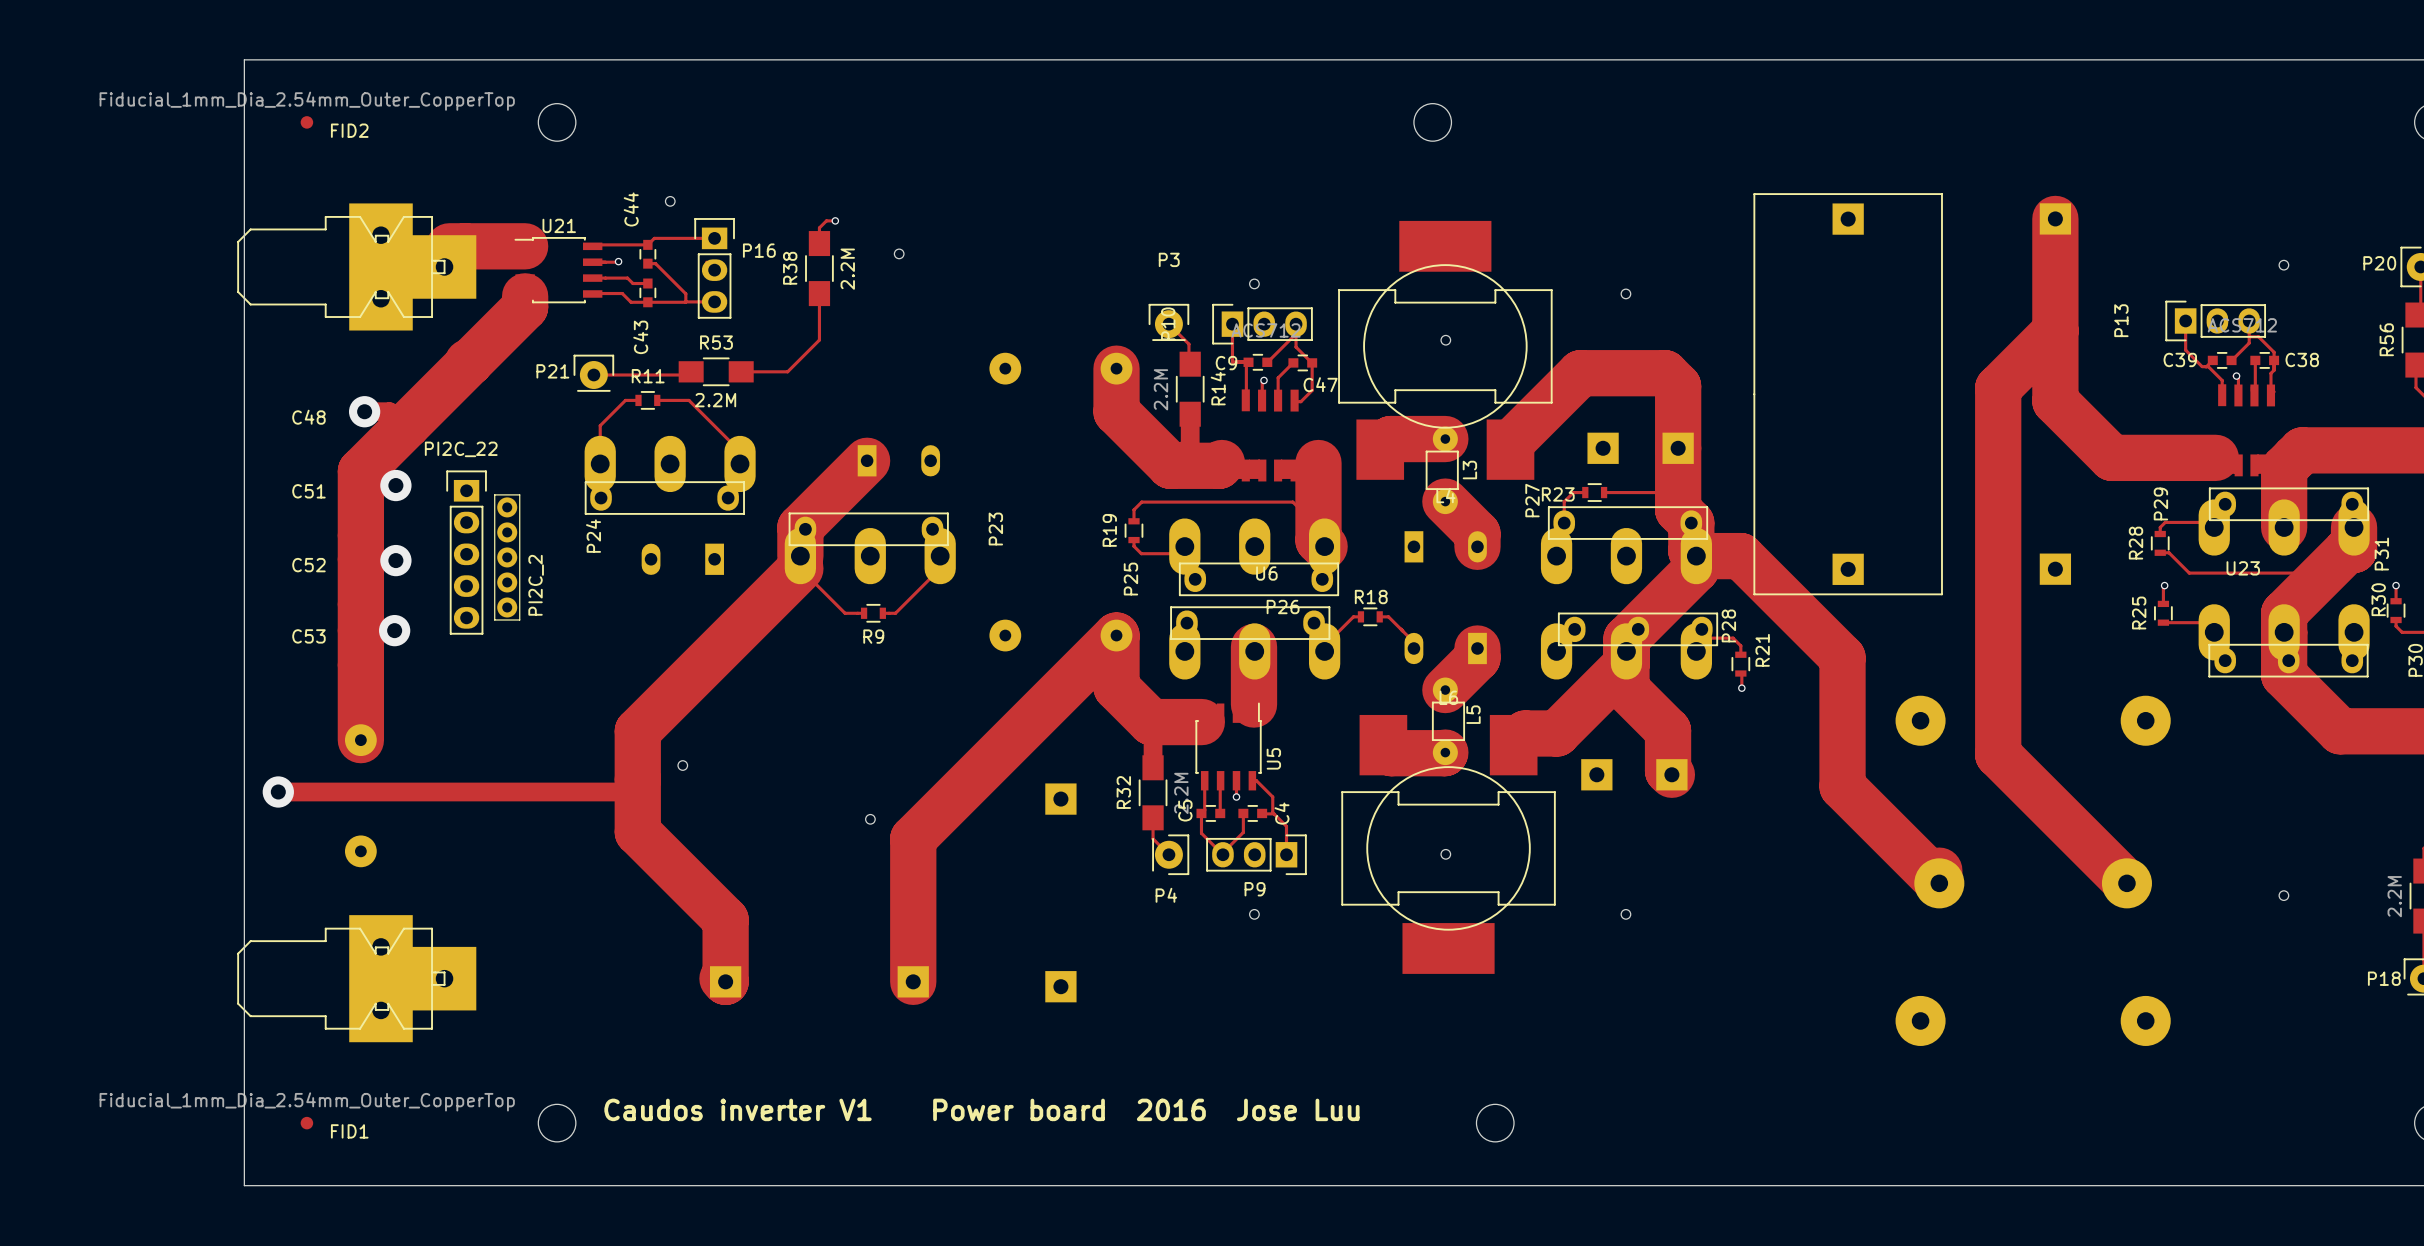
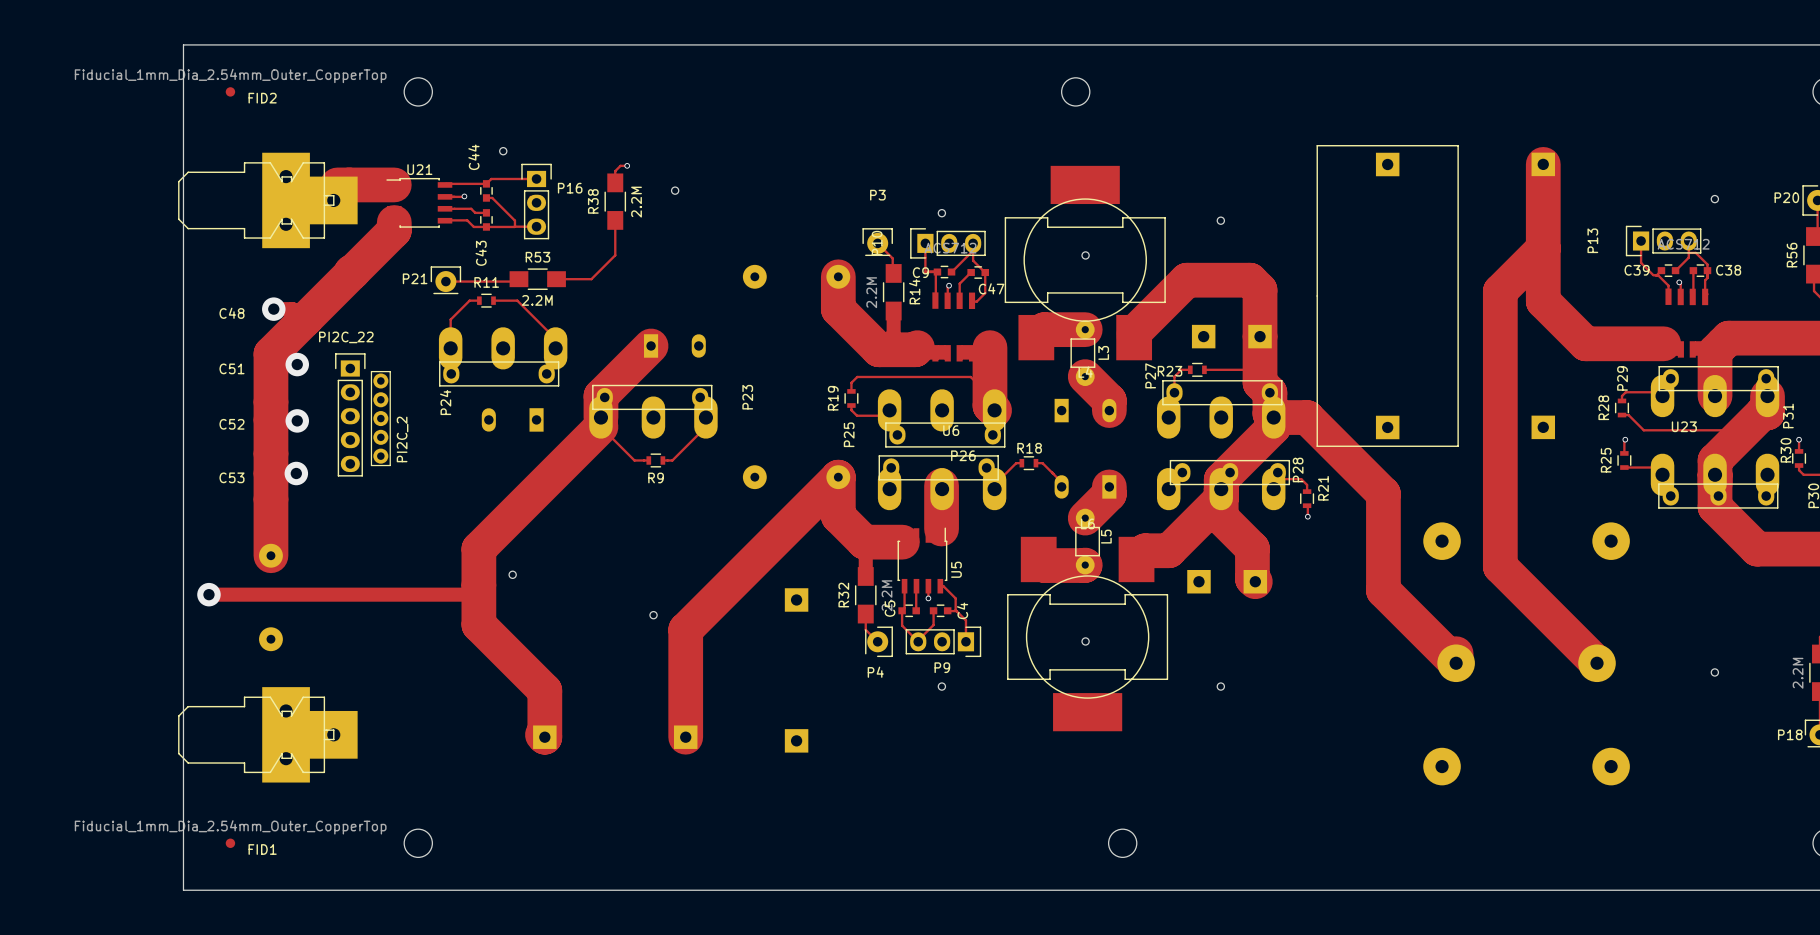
text: Caudos inverter V1 Power board 2016 Jose Luu (981, 1109) -> none

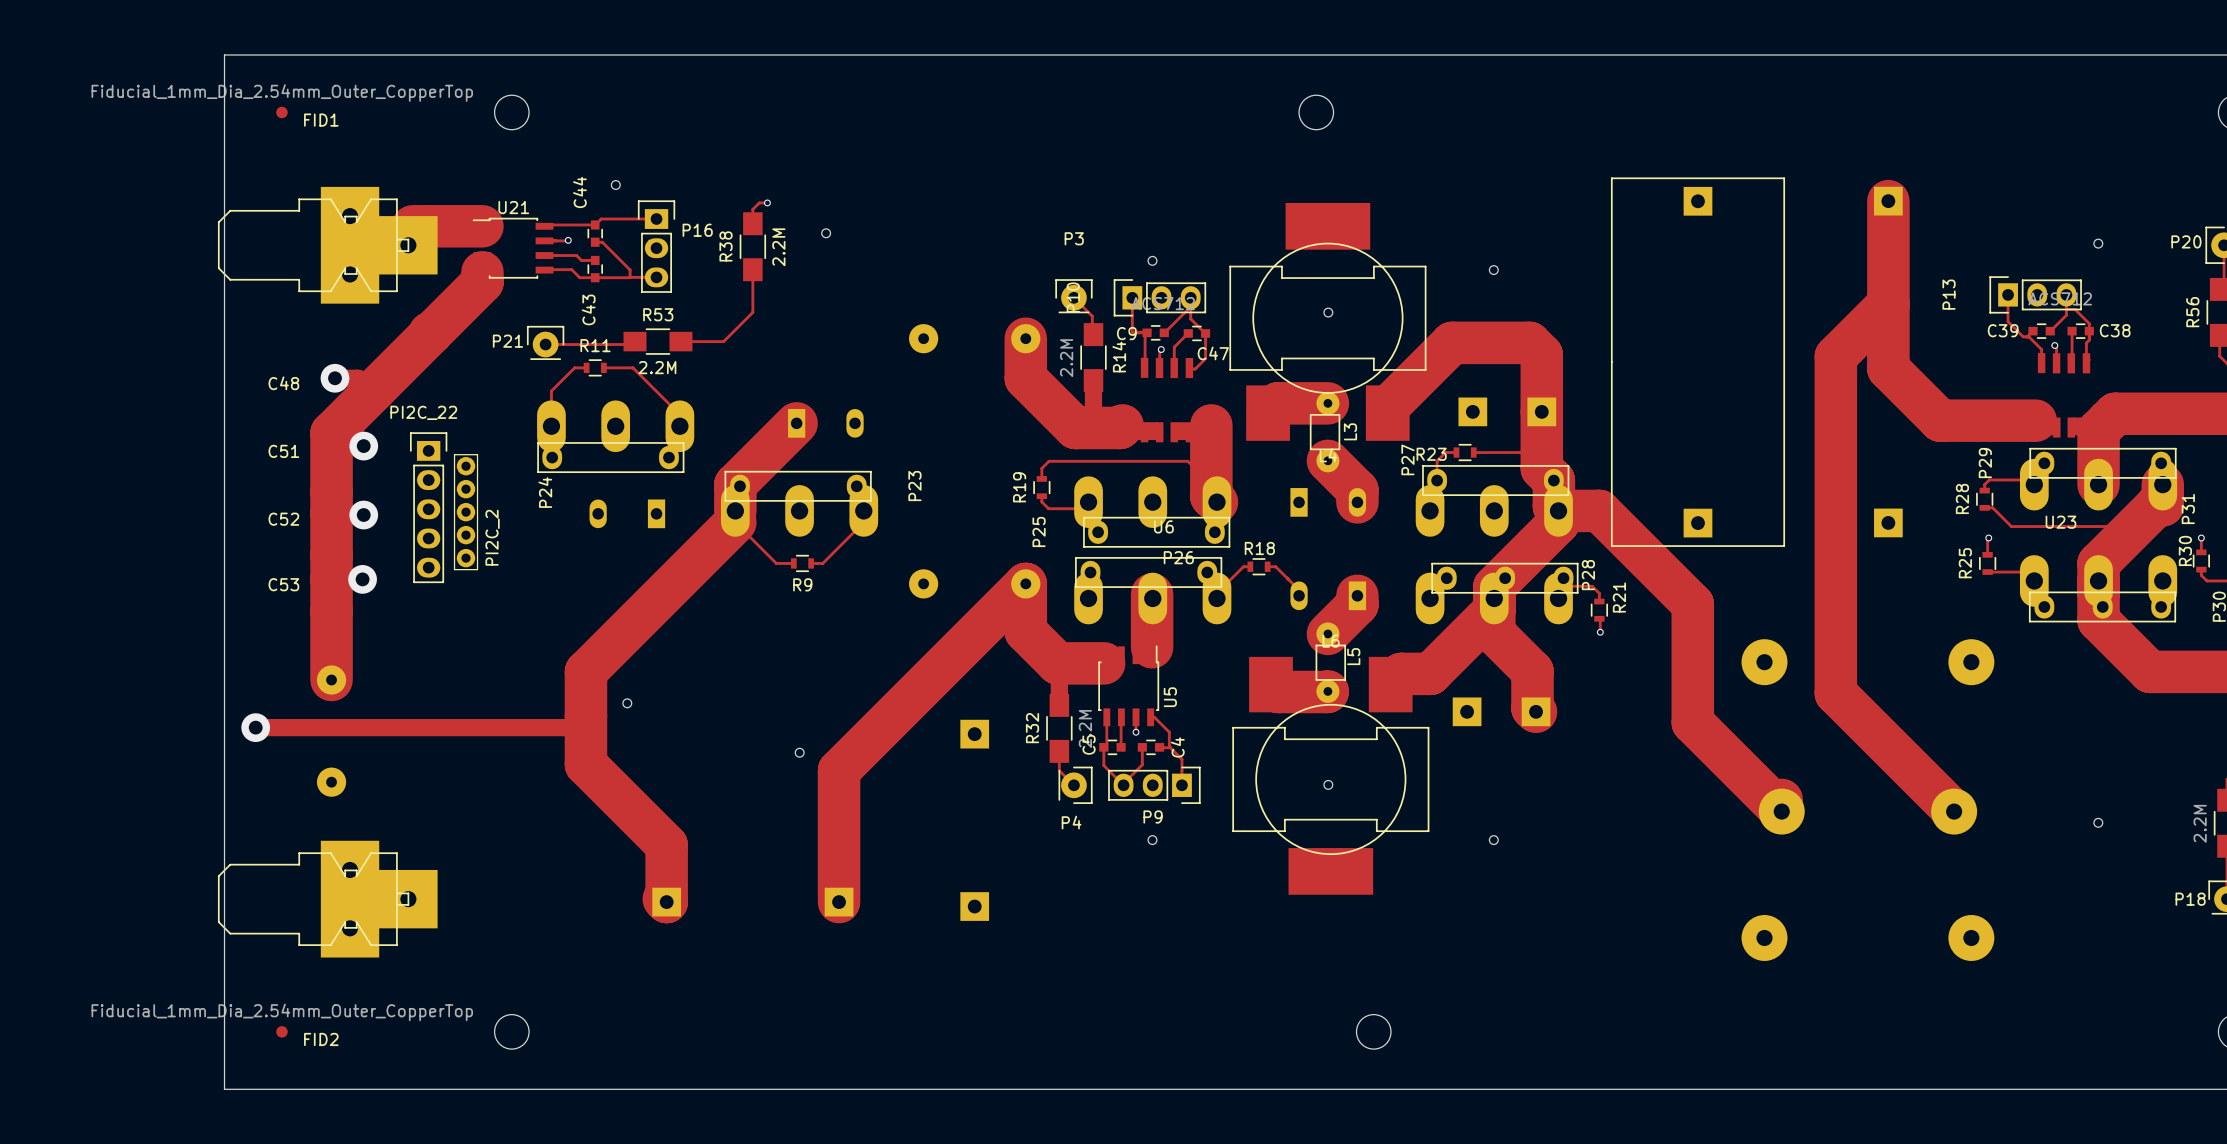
FID2 name: FID2 (262, 98) -> FID1 (321, 120)
FID1 name: FID1 (262, 849) -> FID2 (321, 1039)

